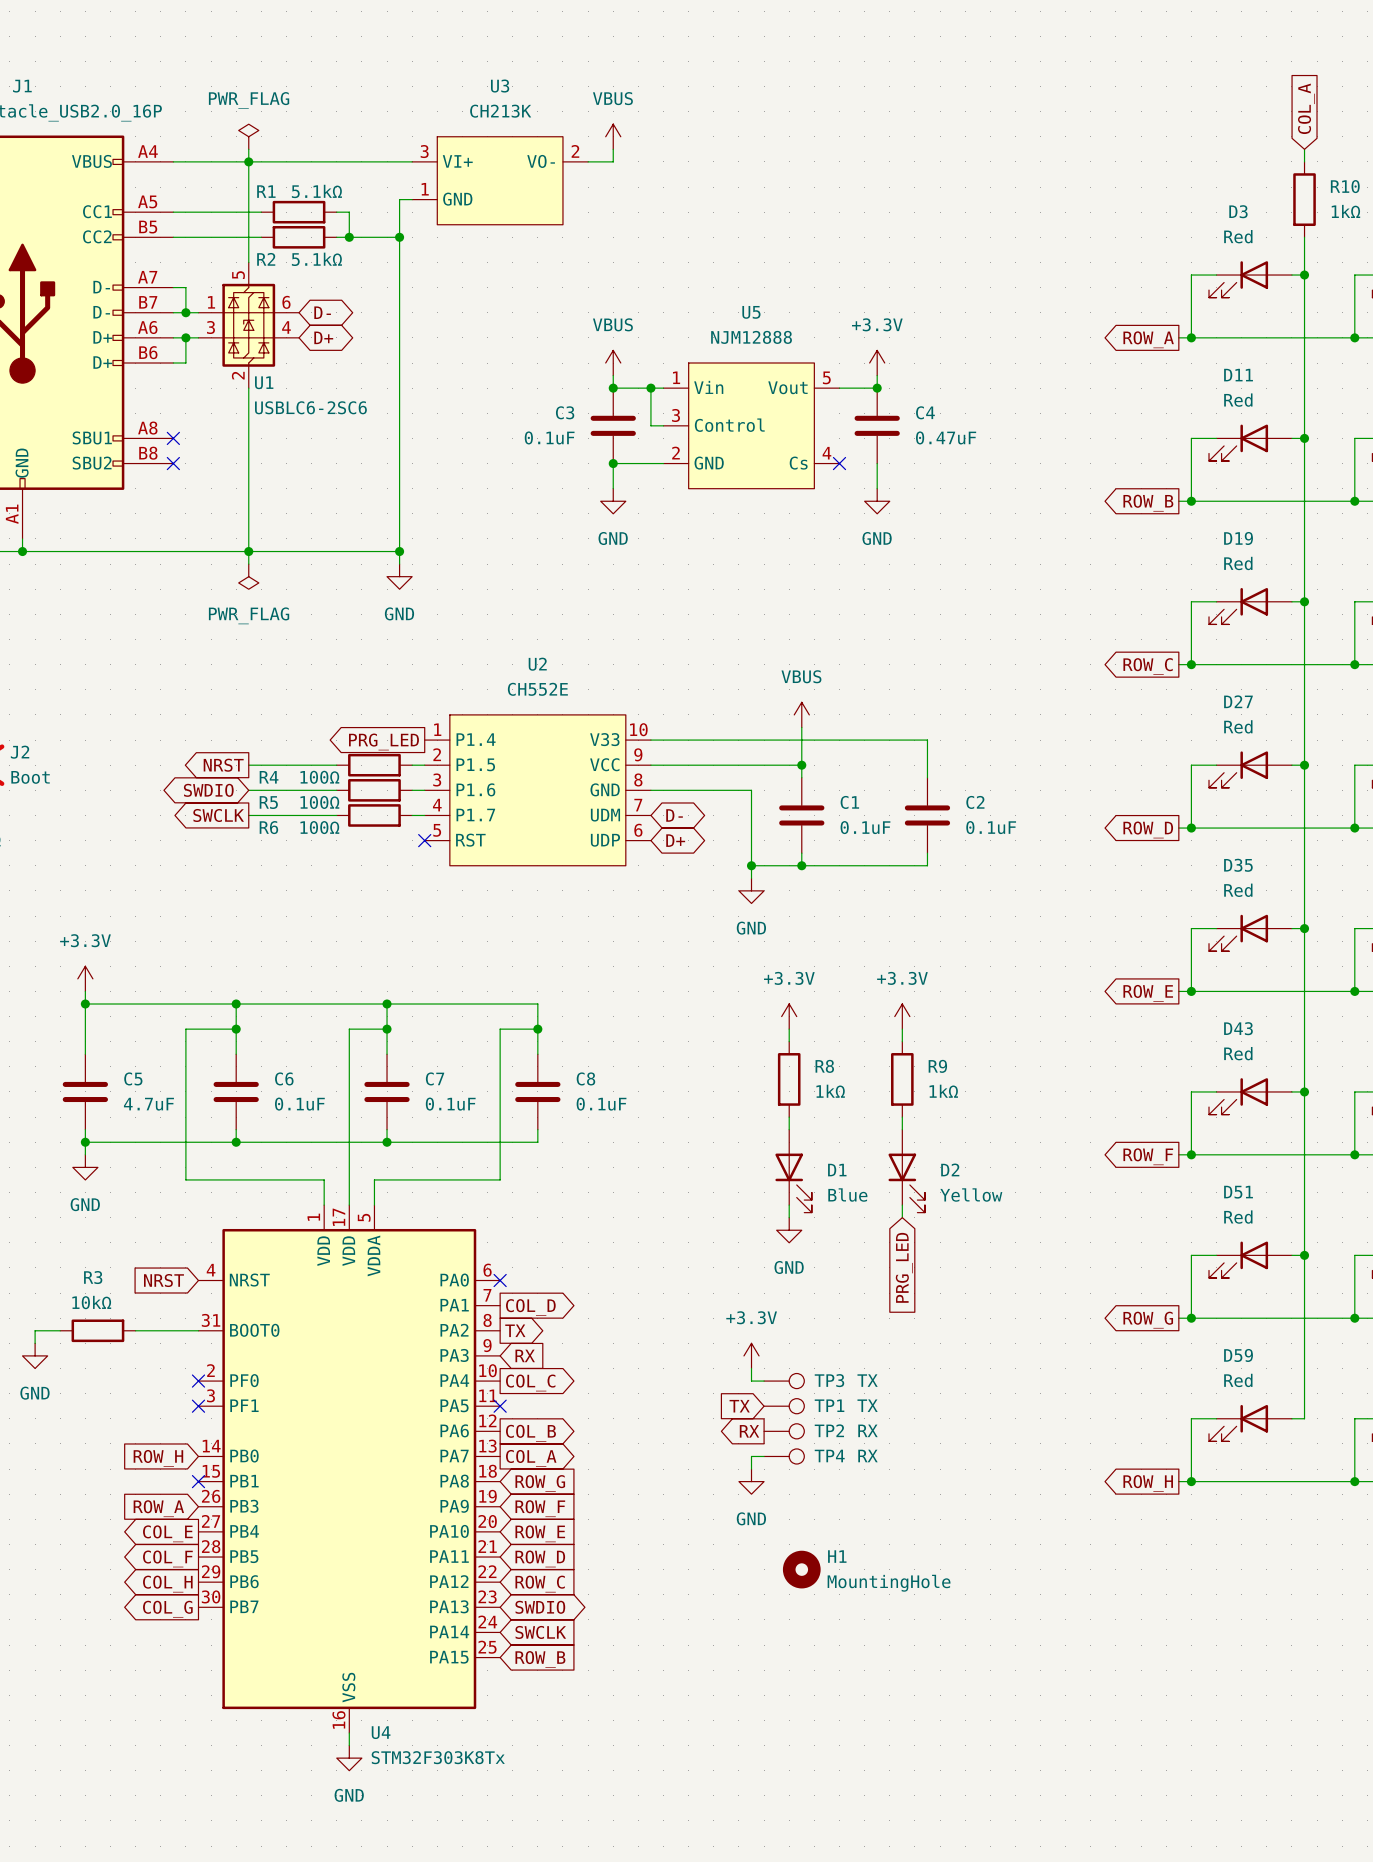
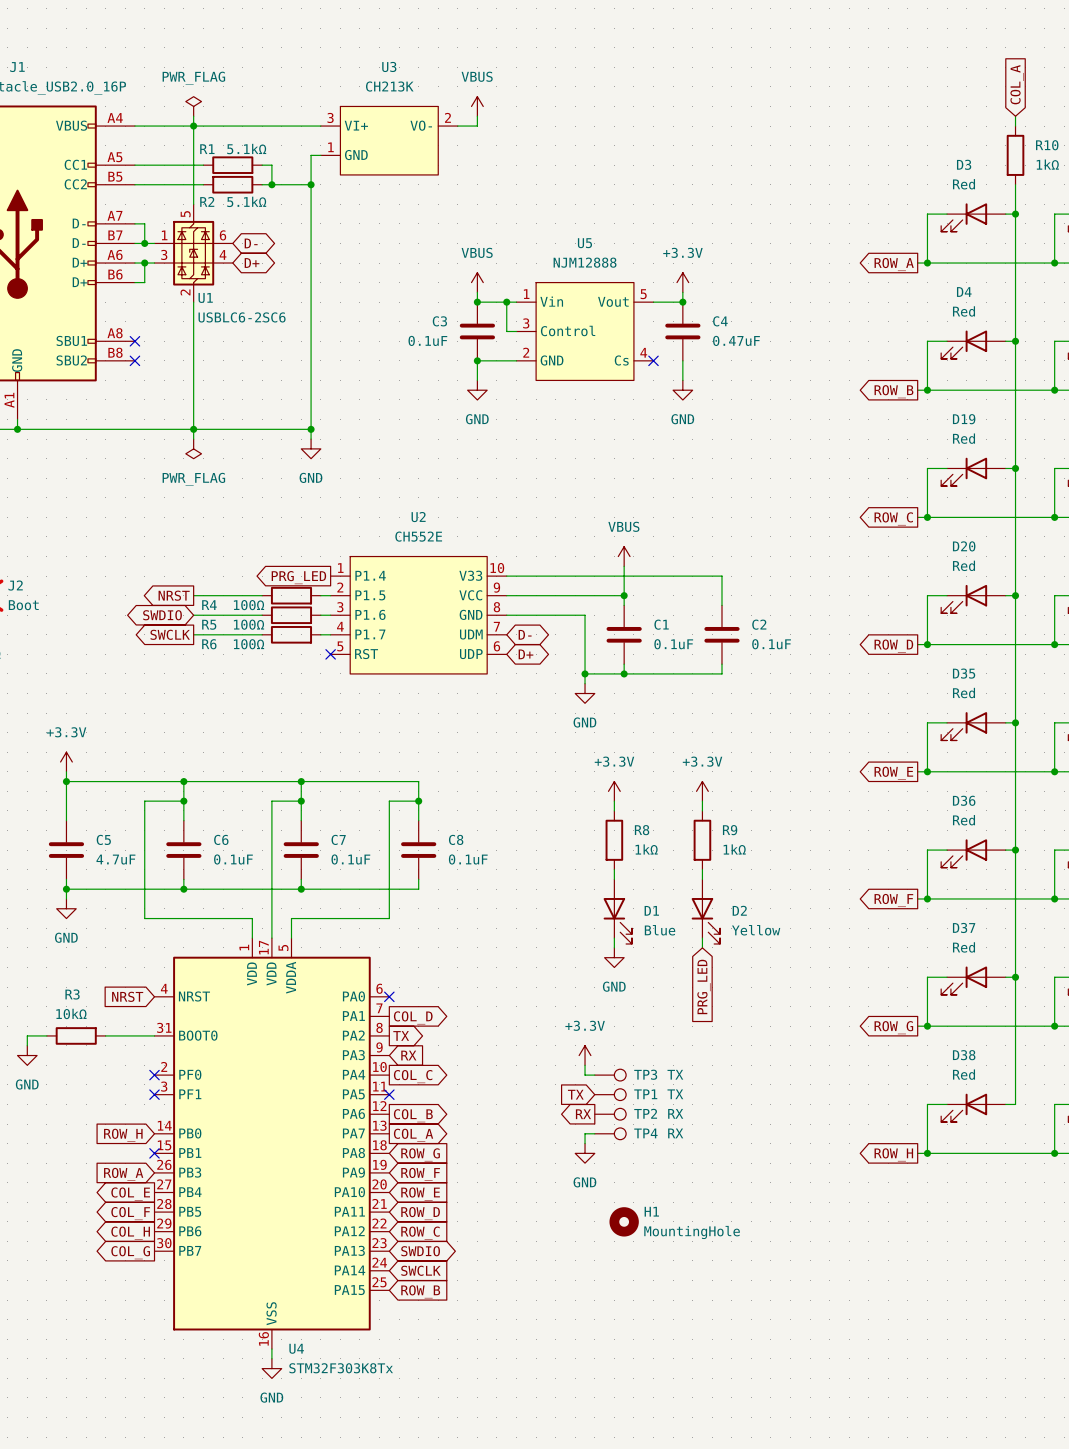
D11 name: D11 (1238, 375) -> D4 (964, 292)
D27 name: D27 (1238, 701) -> D20 (964, 546)
D43 name: D43 (1238, 1028) -> D36 (964, 800)
D51 name: D51 (1238, 1192) -> D37 (964, 927)
D59 name: D59 (1238, 1355) -> D38 (964, 1055)

